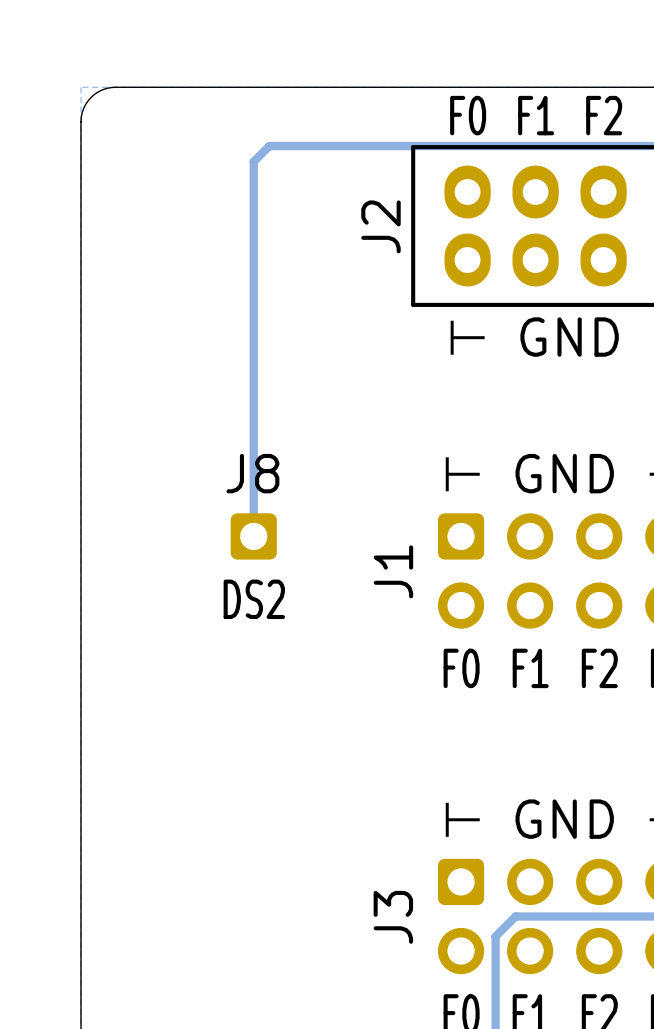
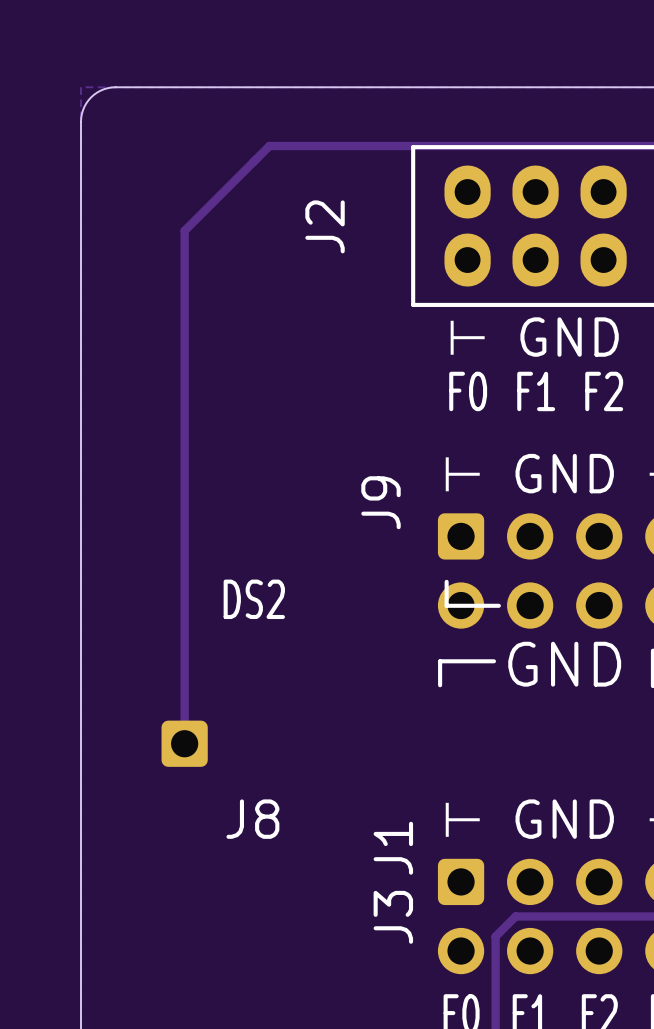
text: F0 (468, 115) -> none
text: F1 (536, 115) -> none
text: F2 (604, 115) -> none
track: (253, 161) (253, 536) -> (253, 161) (184, 230) (184, 743)
text position: J2 (380, 226) -> J2 (325, 226)
text: none -> F0 (468, 391)
text: none -> F1 (536, 391)
text: none -> F2 (604, 391)
text position: J8 (252, 473) -> J8 (252, 819)
text: none -> J9 (380, 502)
part position: (253, 536) -> (184, 743)
text position: J1 (393, 571) -> J1 (393, 848)
line: none -> (446, 581) (446, 605) (498, 605)
line: none -> (493, 661) (440, 661) (440, 685)
text: none -> GND (564, 664)
text: F0 (461, 668) -> none
text: F1 (530, 668) -> none
text: F2 (599, 668) -> none

